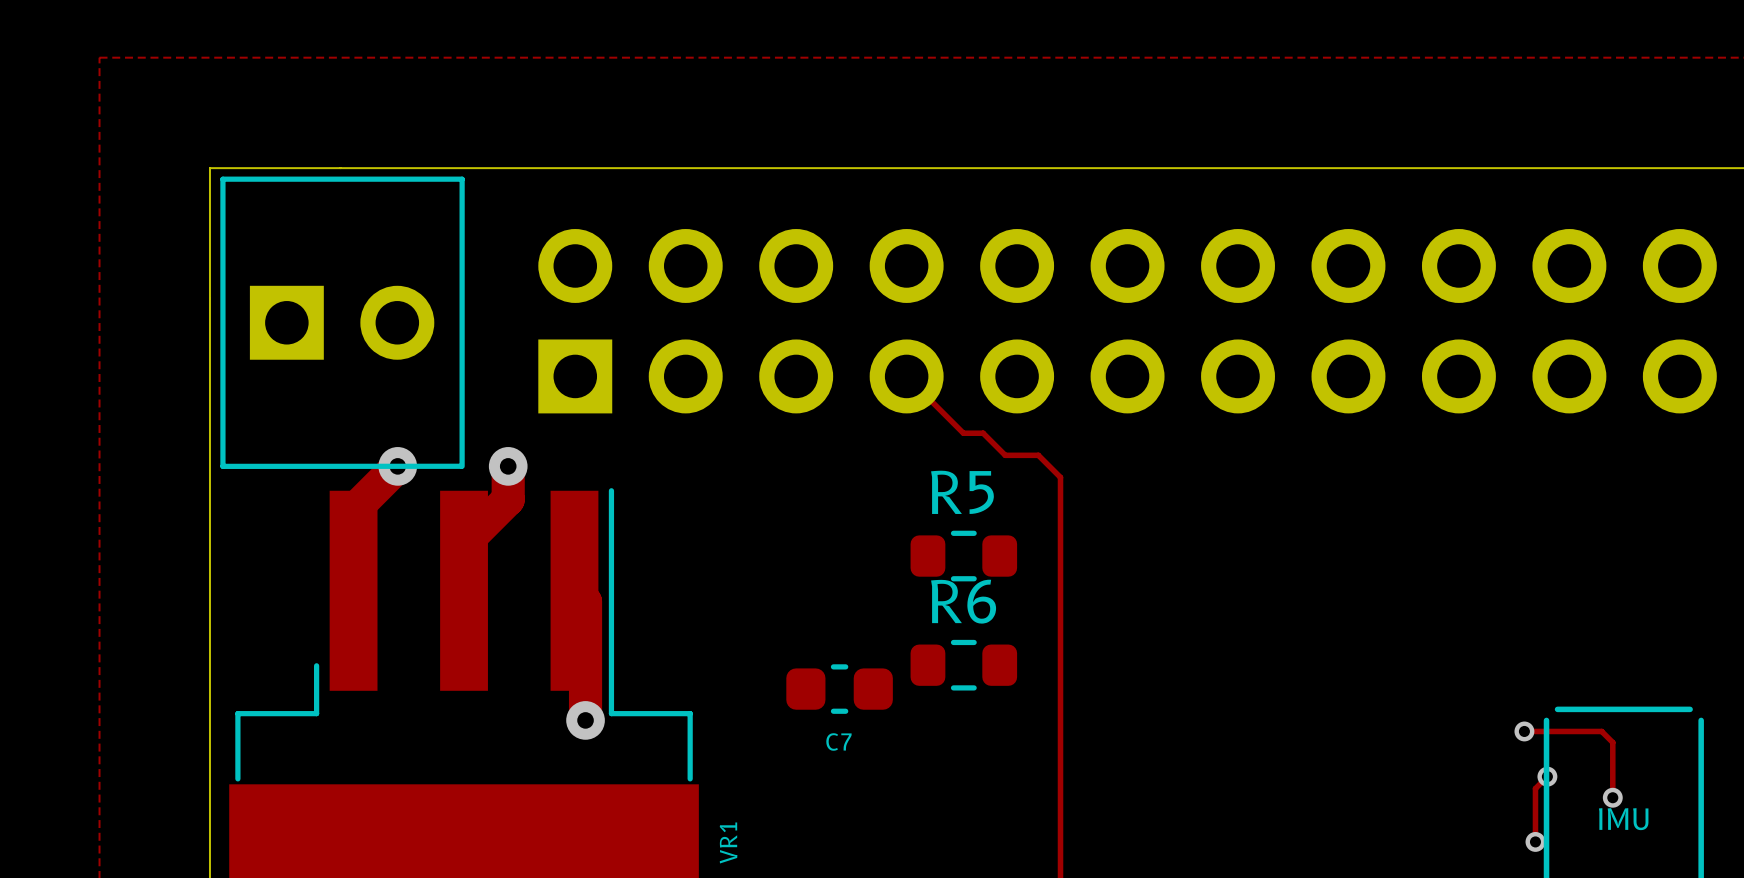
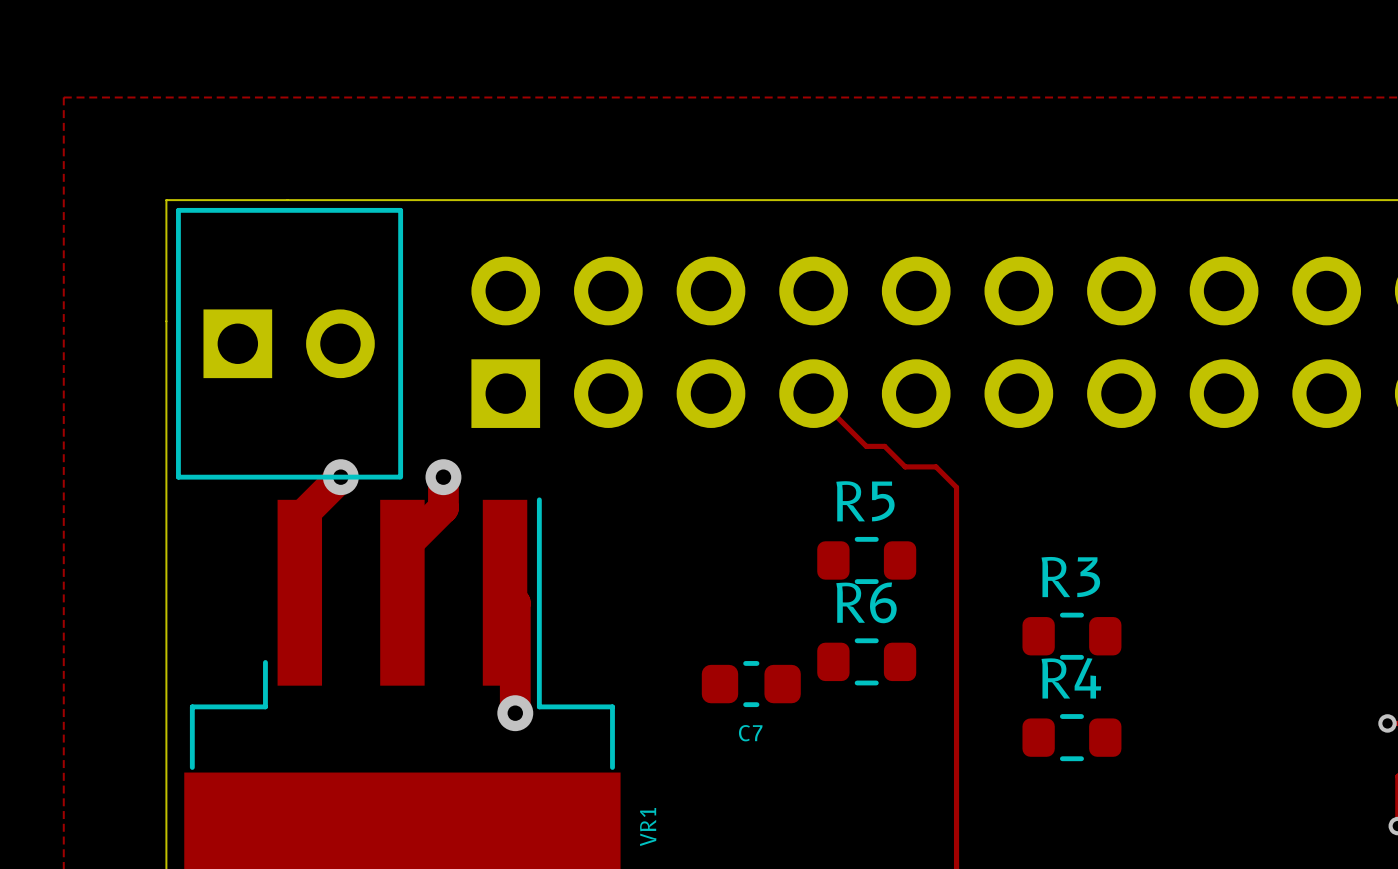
R3: none -> (1071, 636)
R4: none -> (1071, 737)

